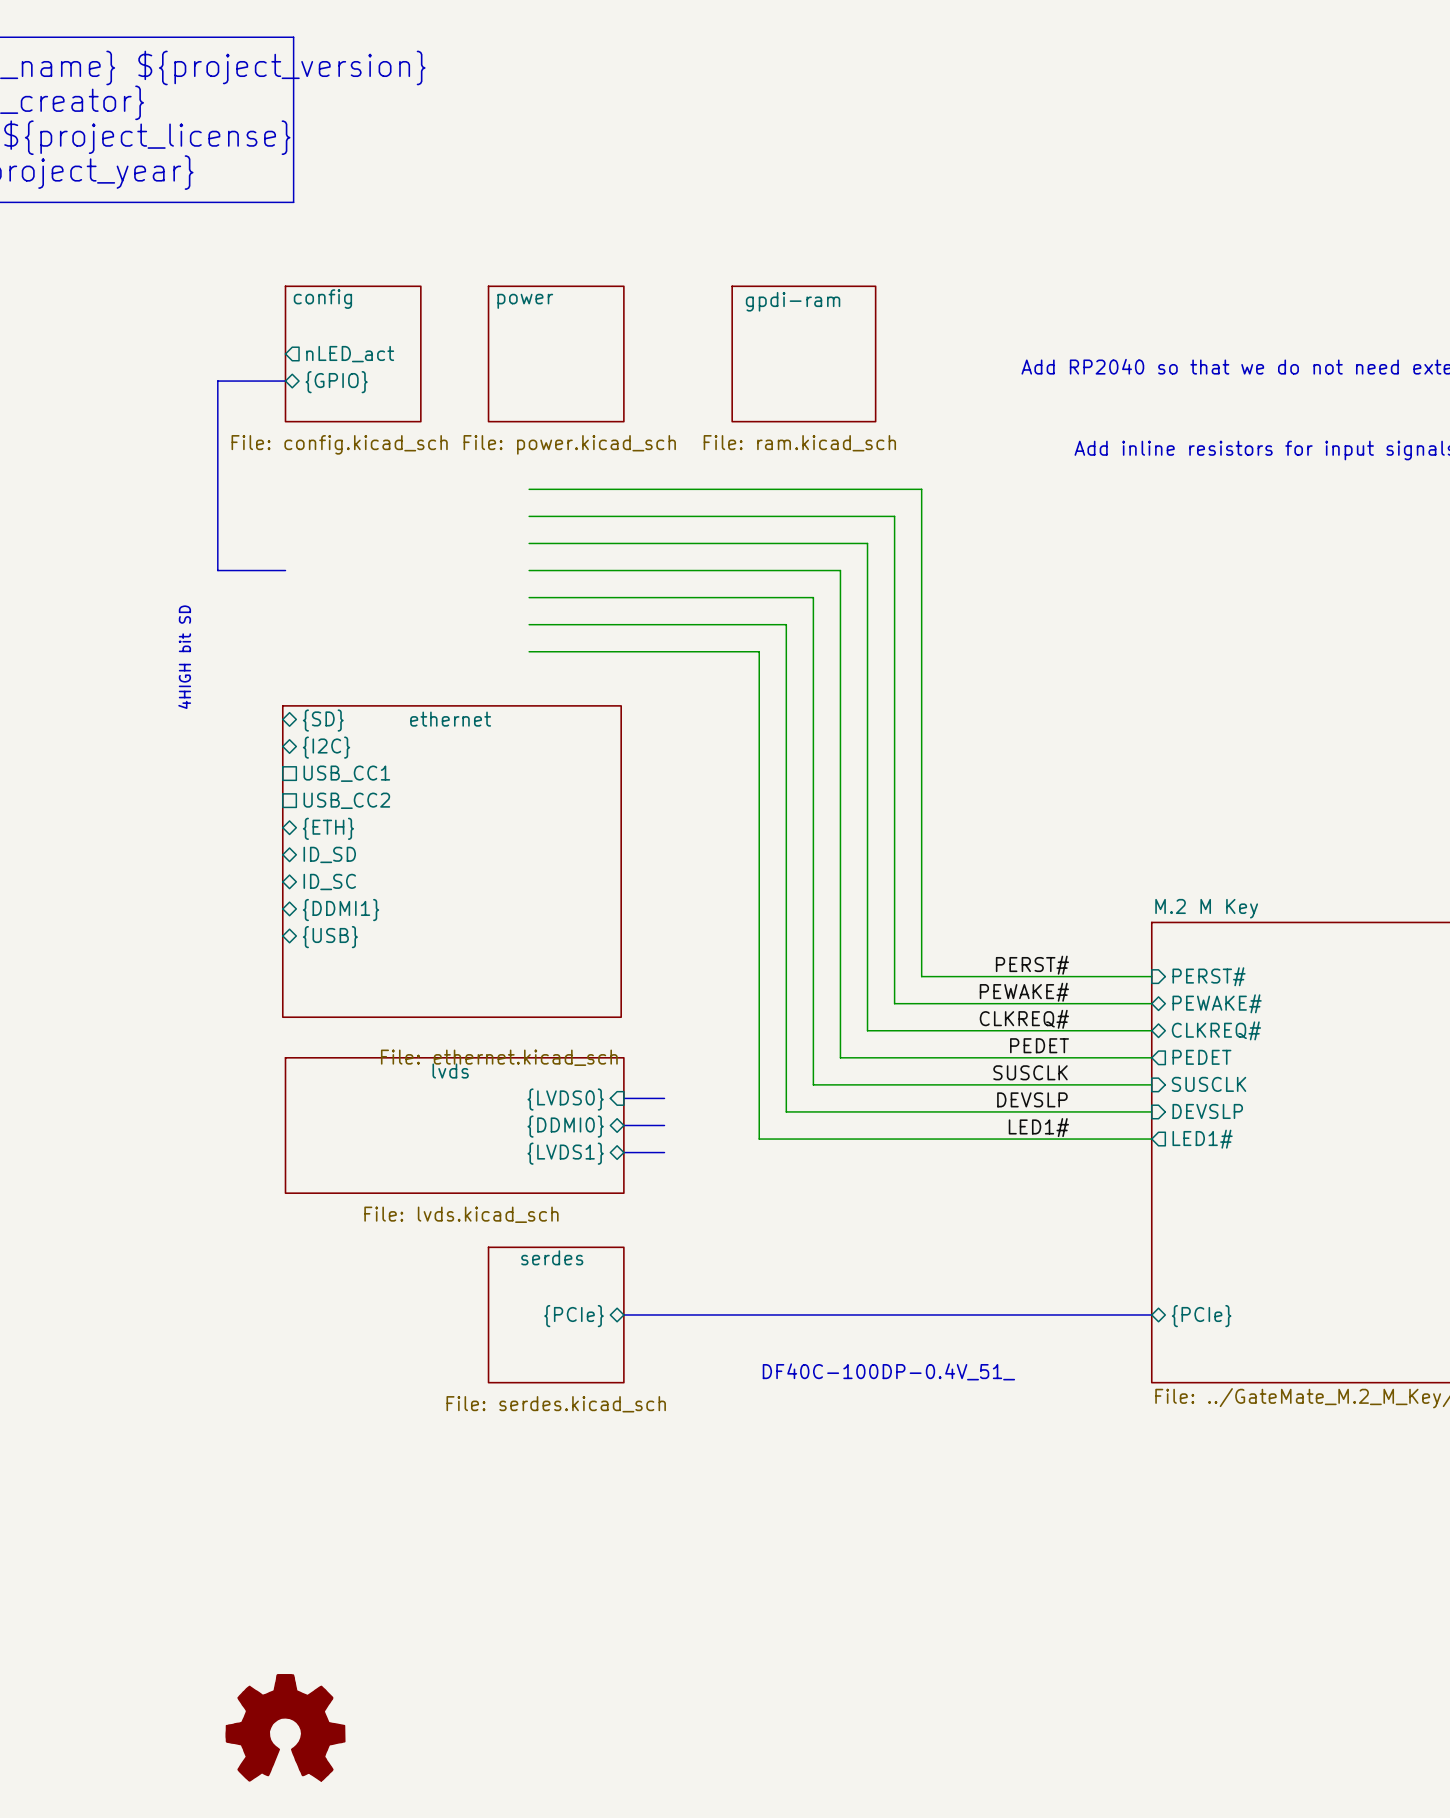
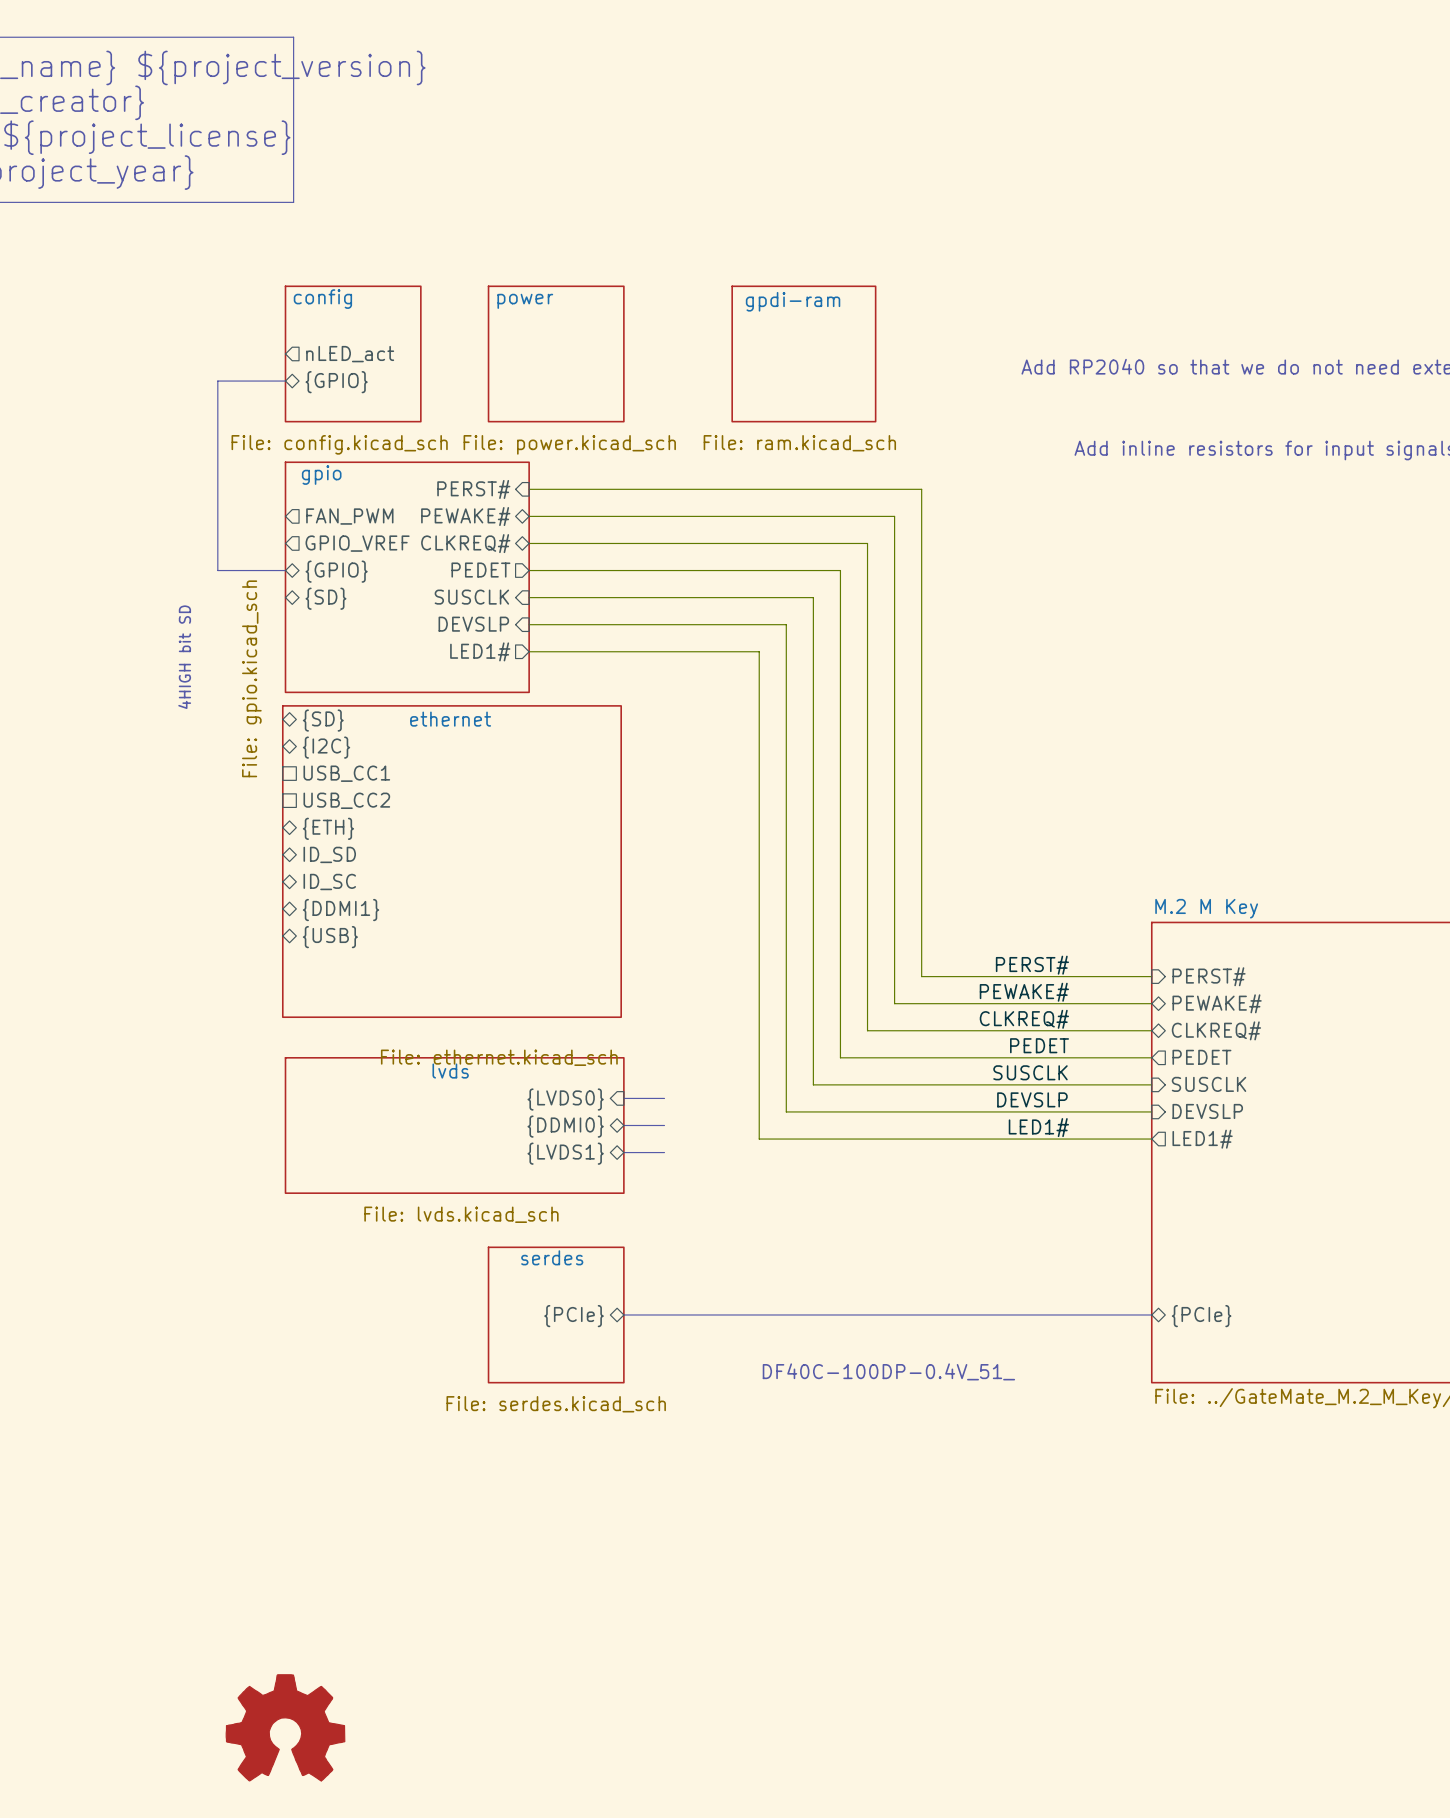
sheet pin: none -> PERST# (473, 489)
sheet pin: none -> FAN_PWM (349, 516)
sheet pin: none -> PEWAKE# (465, 516)
sheet pin: none -> GPIO_VREF (357, 543)
sheet pin: none -> CLKREQ# (465, 543)
sheet pin: none -> PEDET (480, 570)
sheet pin: none -> {GPIO} (336, 571)
sheet gpio: none -> File: gpio.kicad_sch (407, 577)
sheet pin: none -> SUSCLK (471, 597)
sheet pin: none -> {SD} (325, 598)
sheet pin: none -> DEVSLP (473, 624)
sheet pin: none -> LED1# (480, 651)

